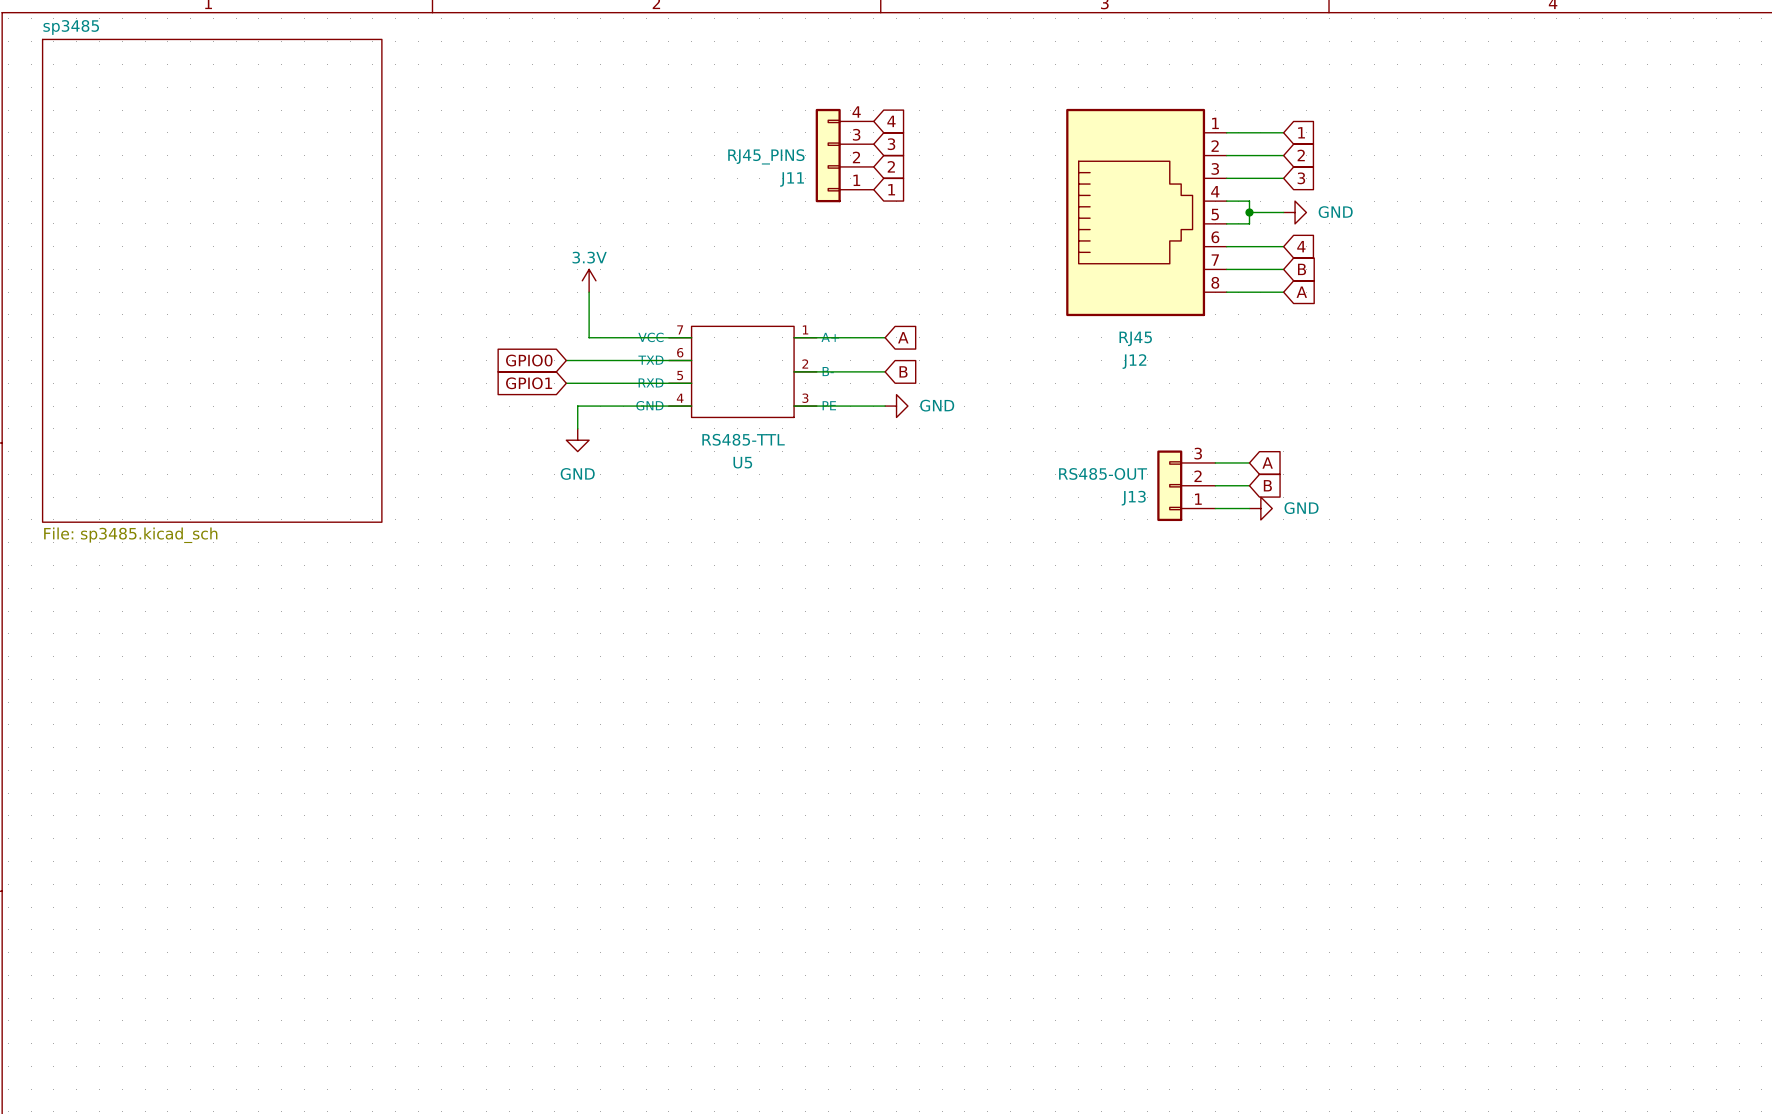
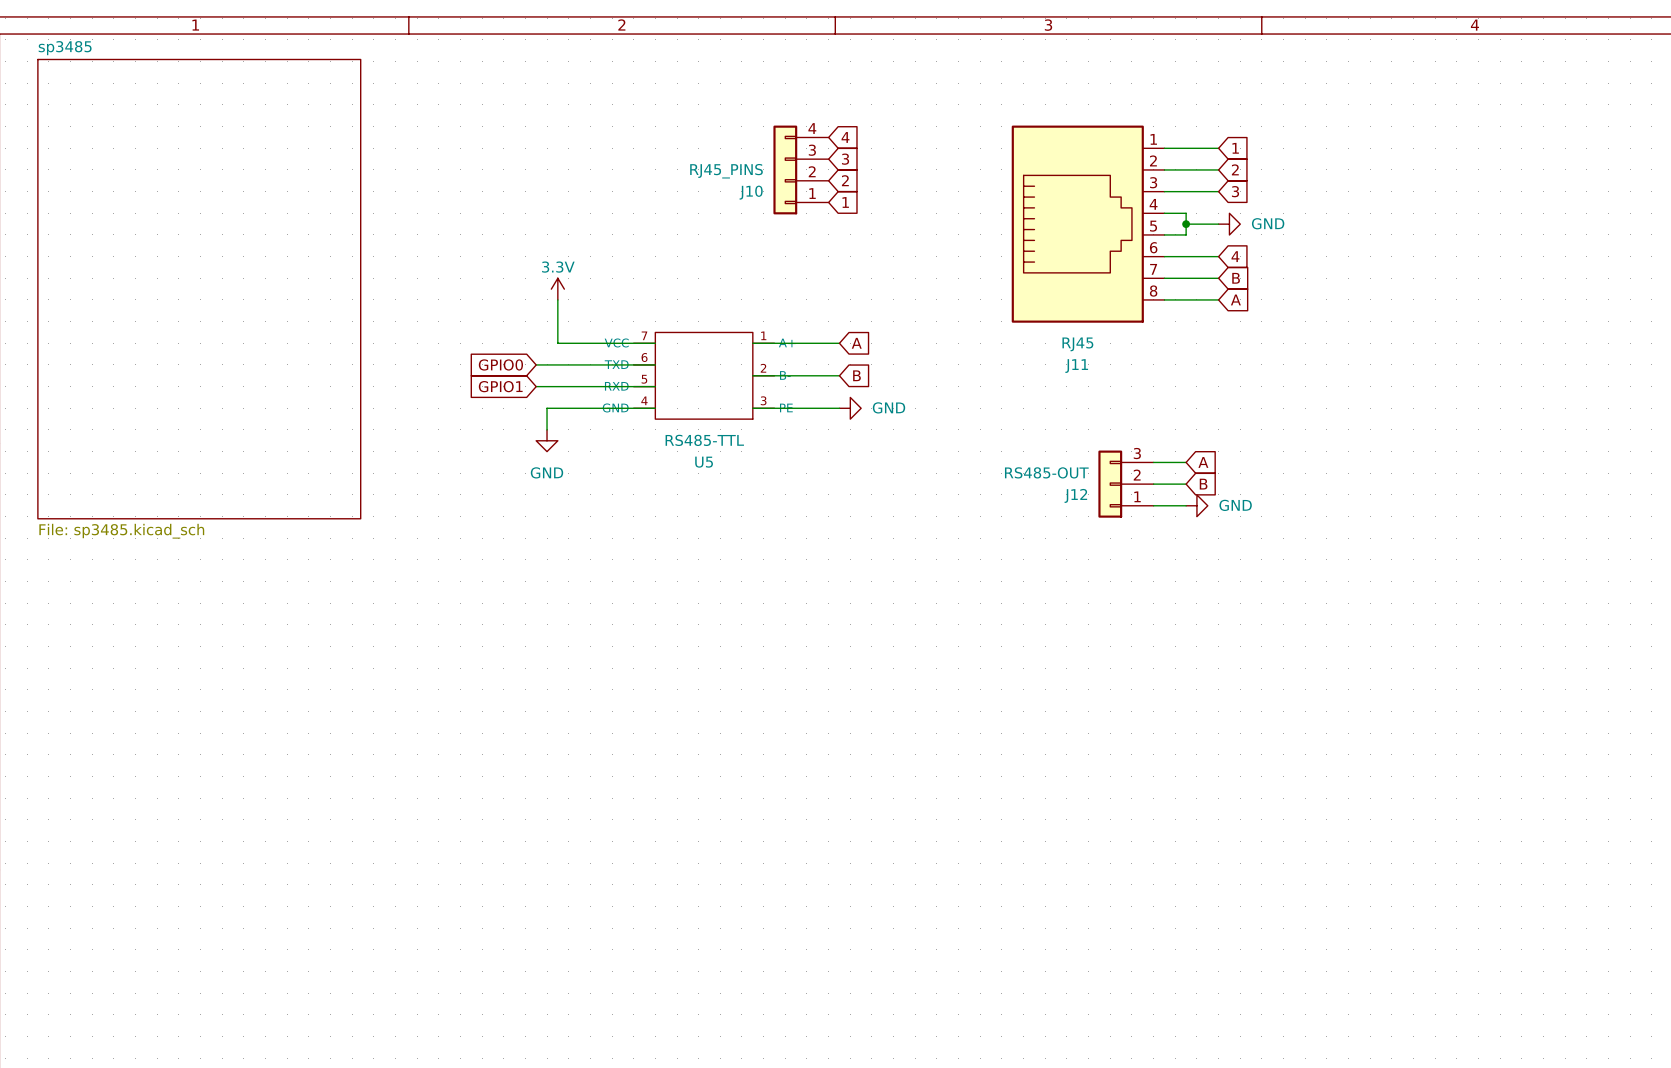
J11 name: J11 (792, 179) -> J10 (751, 192)
J12 name: J12 (1134, 361) -> J11 (1076, 366)
J13 name: J13 (1133, 498) -> J12 (1075, 495)

